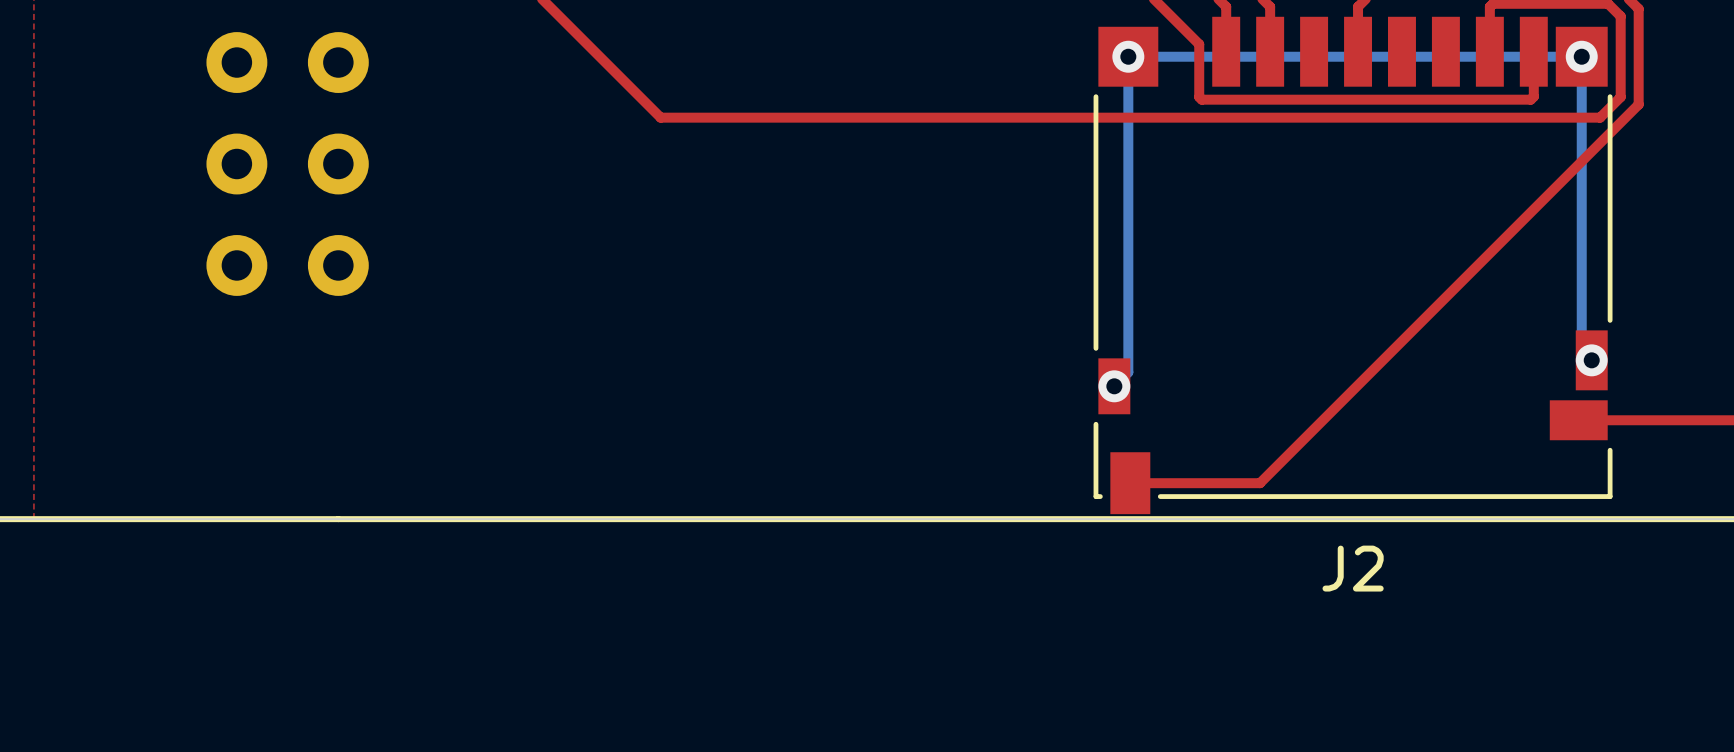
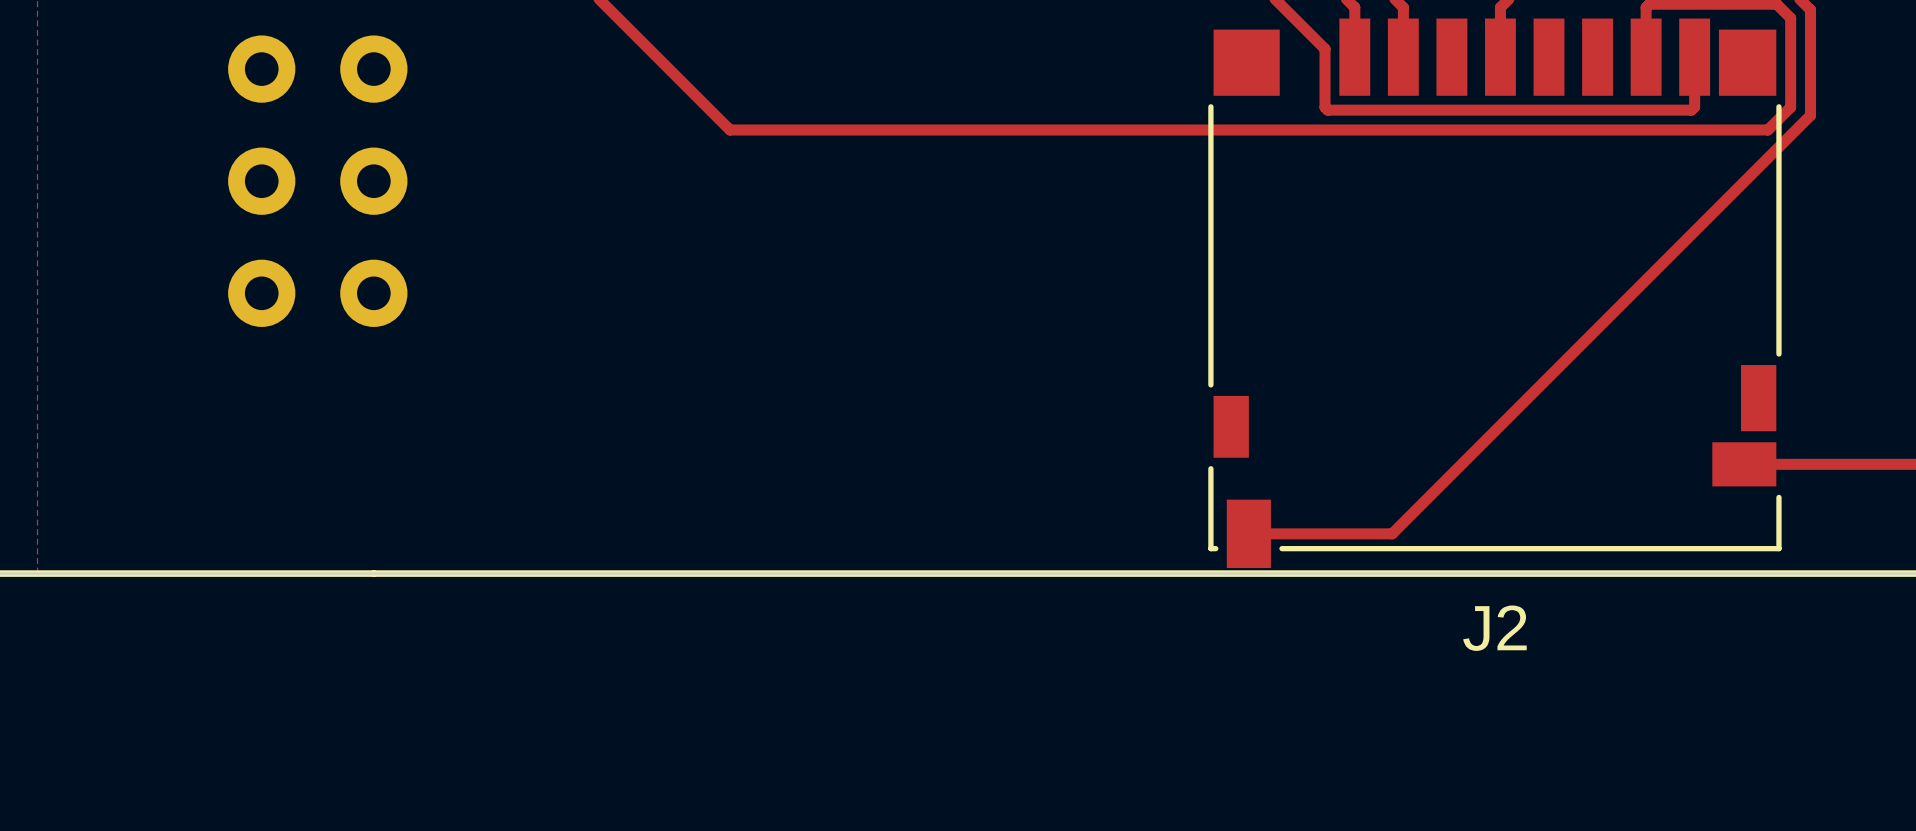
via: (1128, 56) -> none
via: (1581, 56) -> none
bottom track: (1591, 360) (1581, 350) (1581, 56) (1128, 56) (1128, 372) (1114, 386) -> none
via: (1591, 360) -> none
via: (1114, 386) -> none

